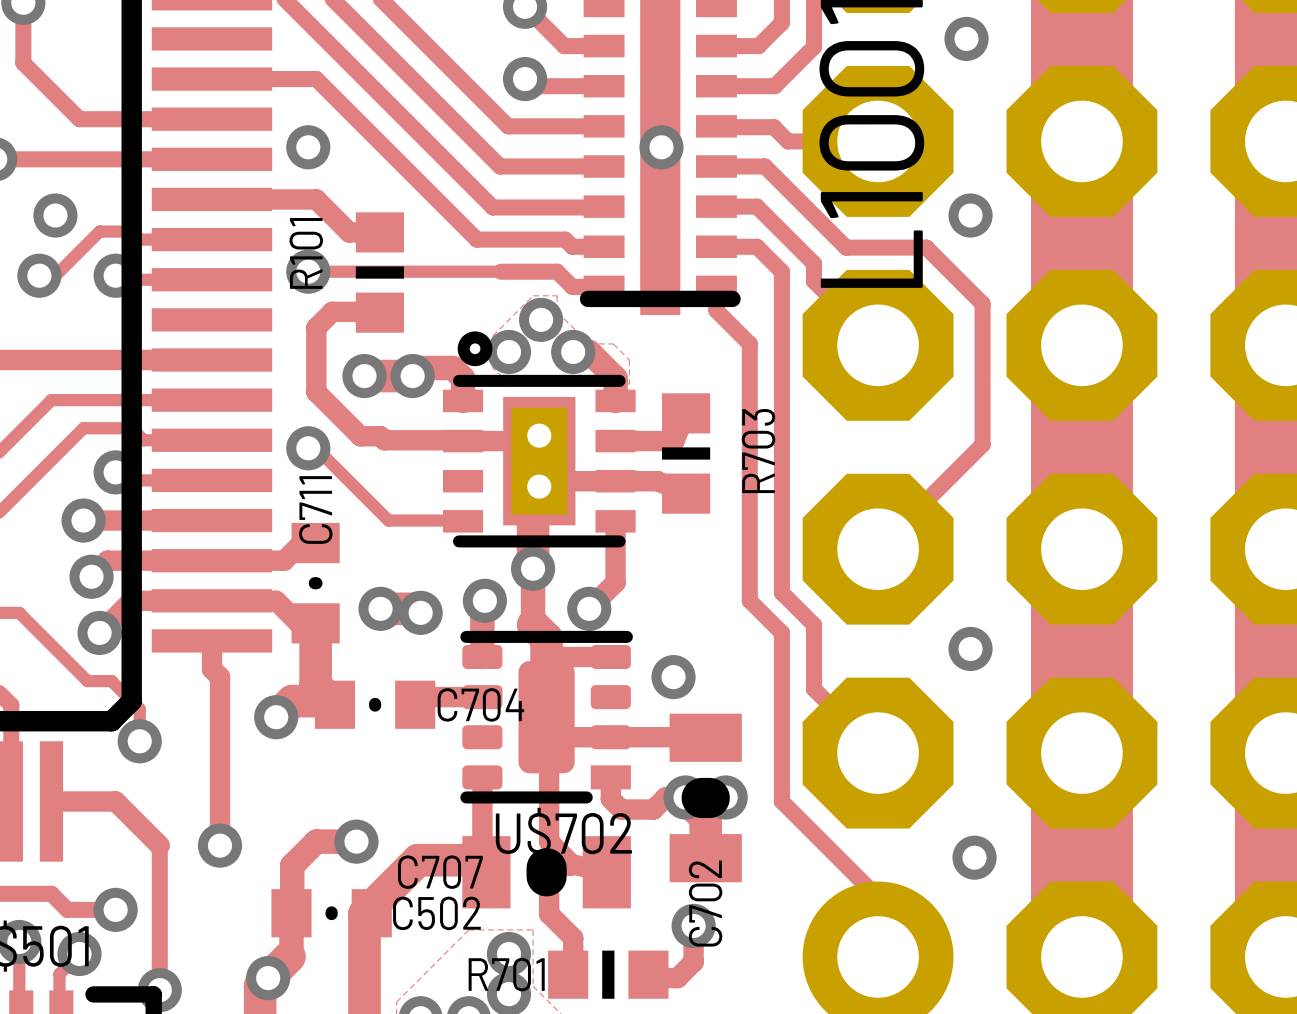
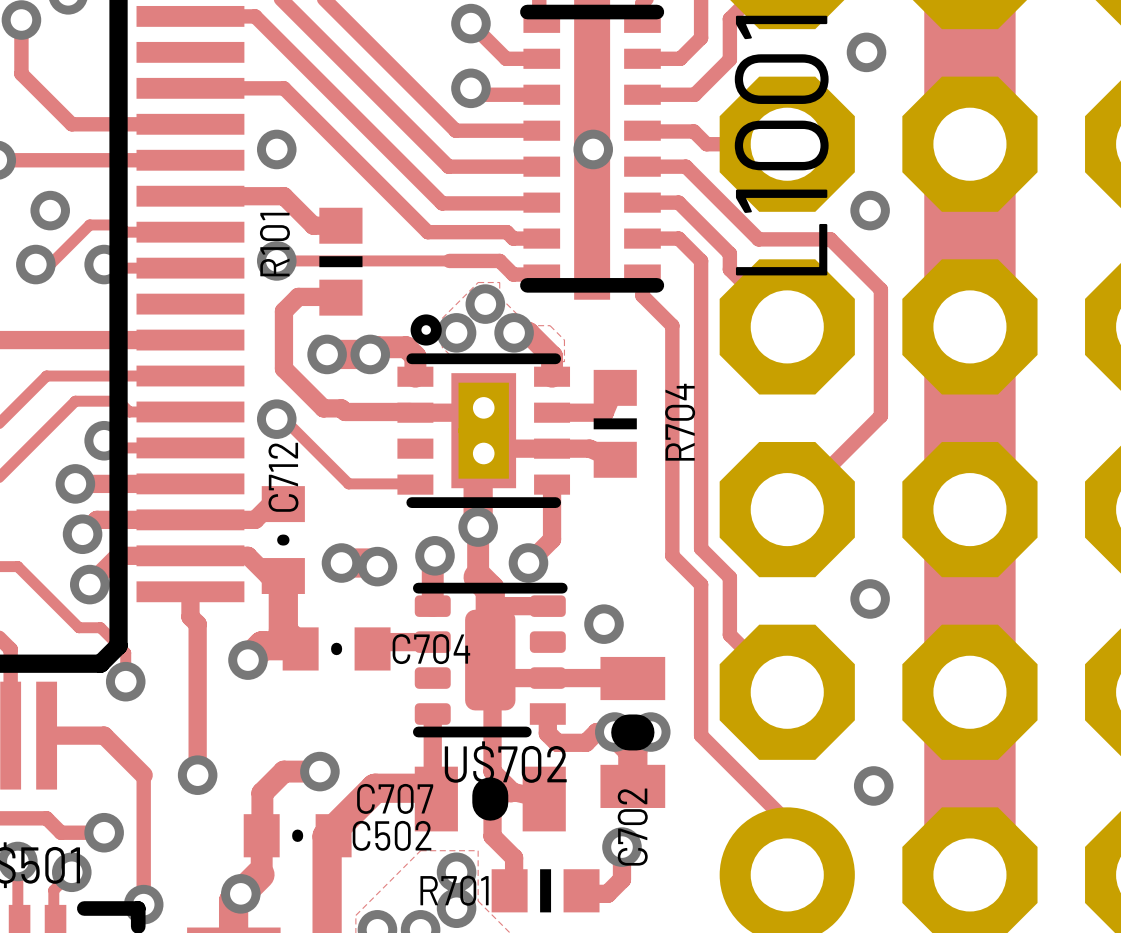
R703 name: R703 (758, 451) -> R704 (680, 422)
C711 name: C711 (315, 510) -> C712 (283, 477)

